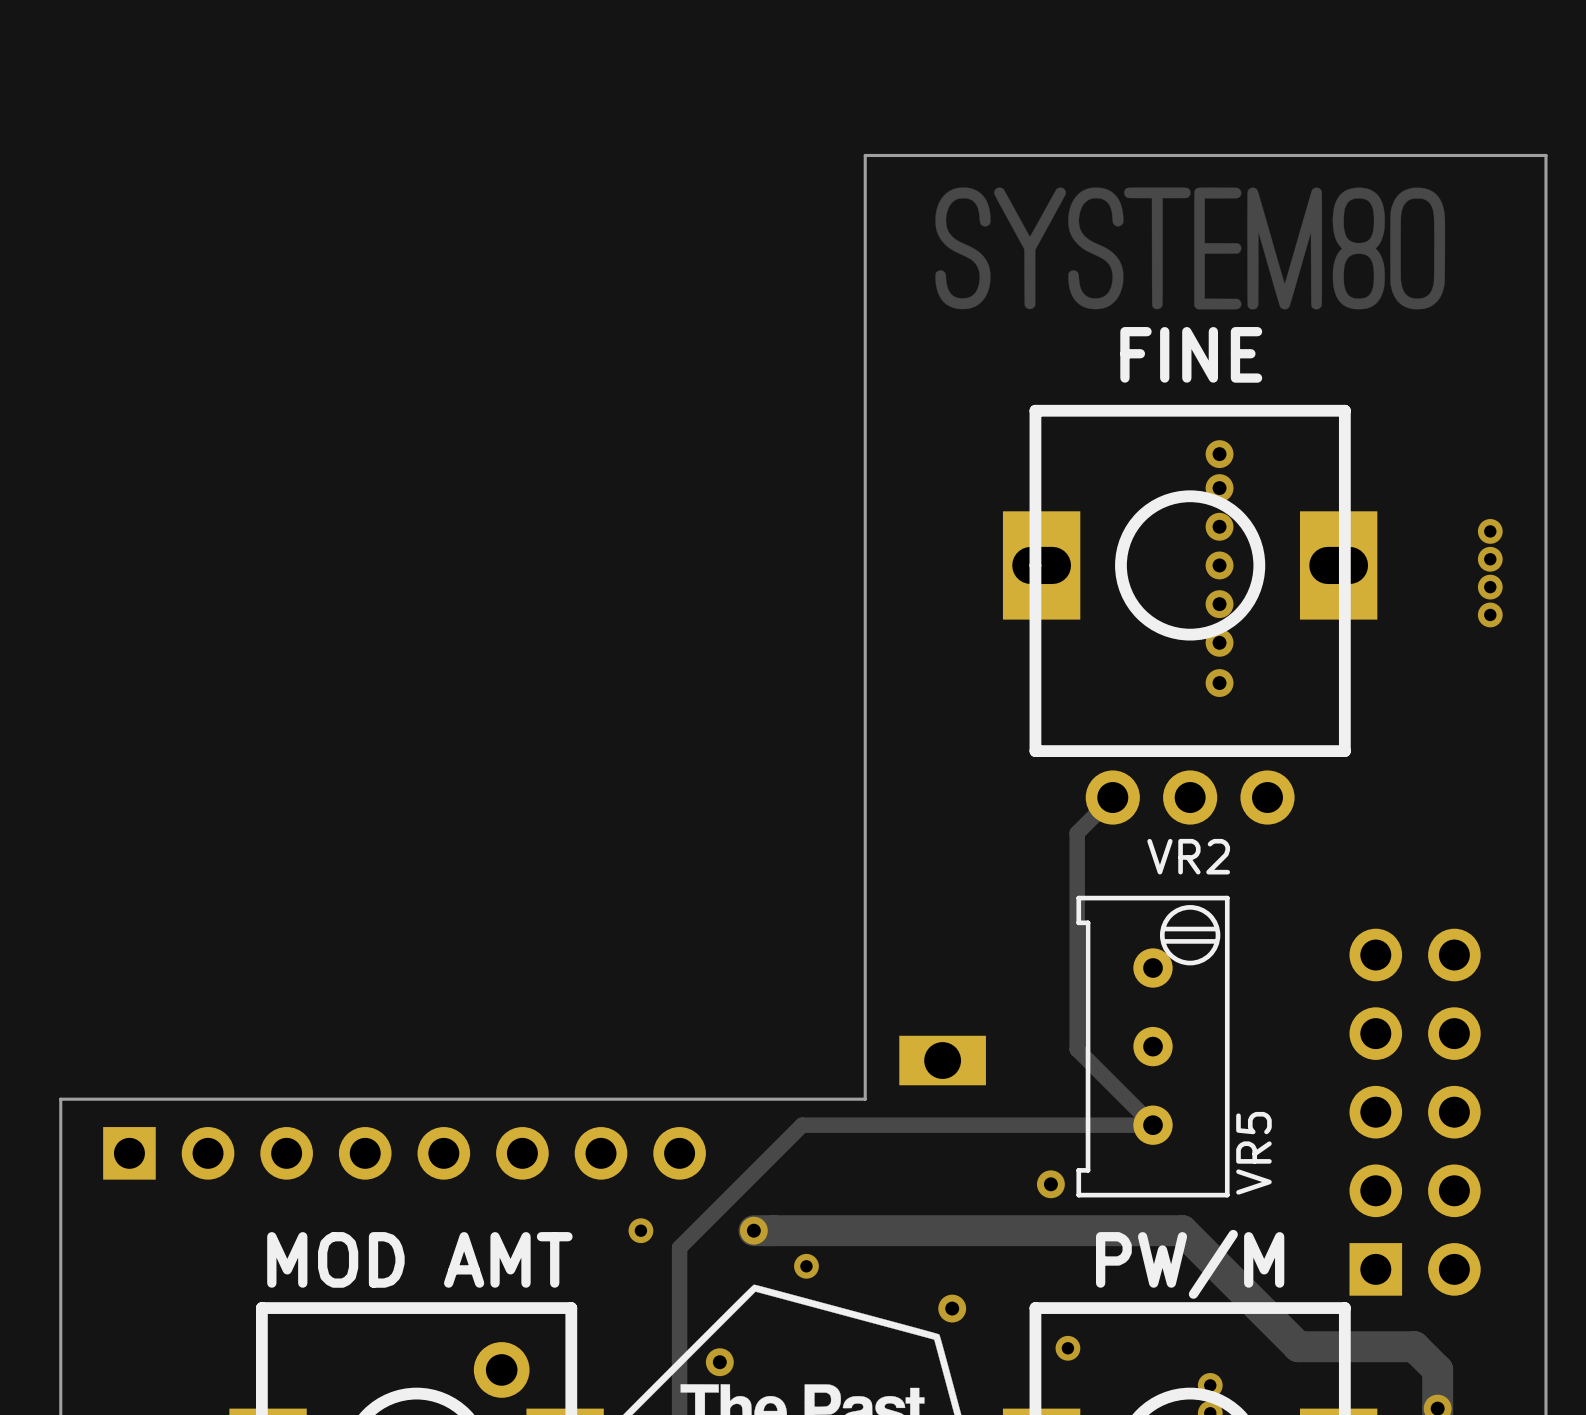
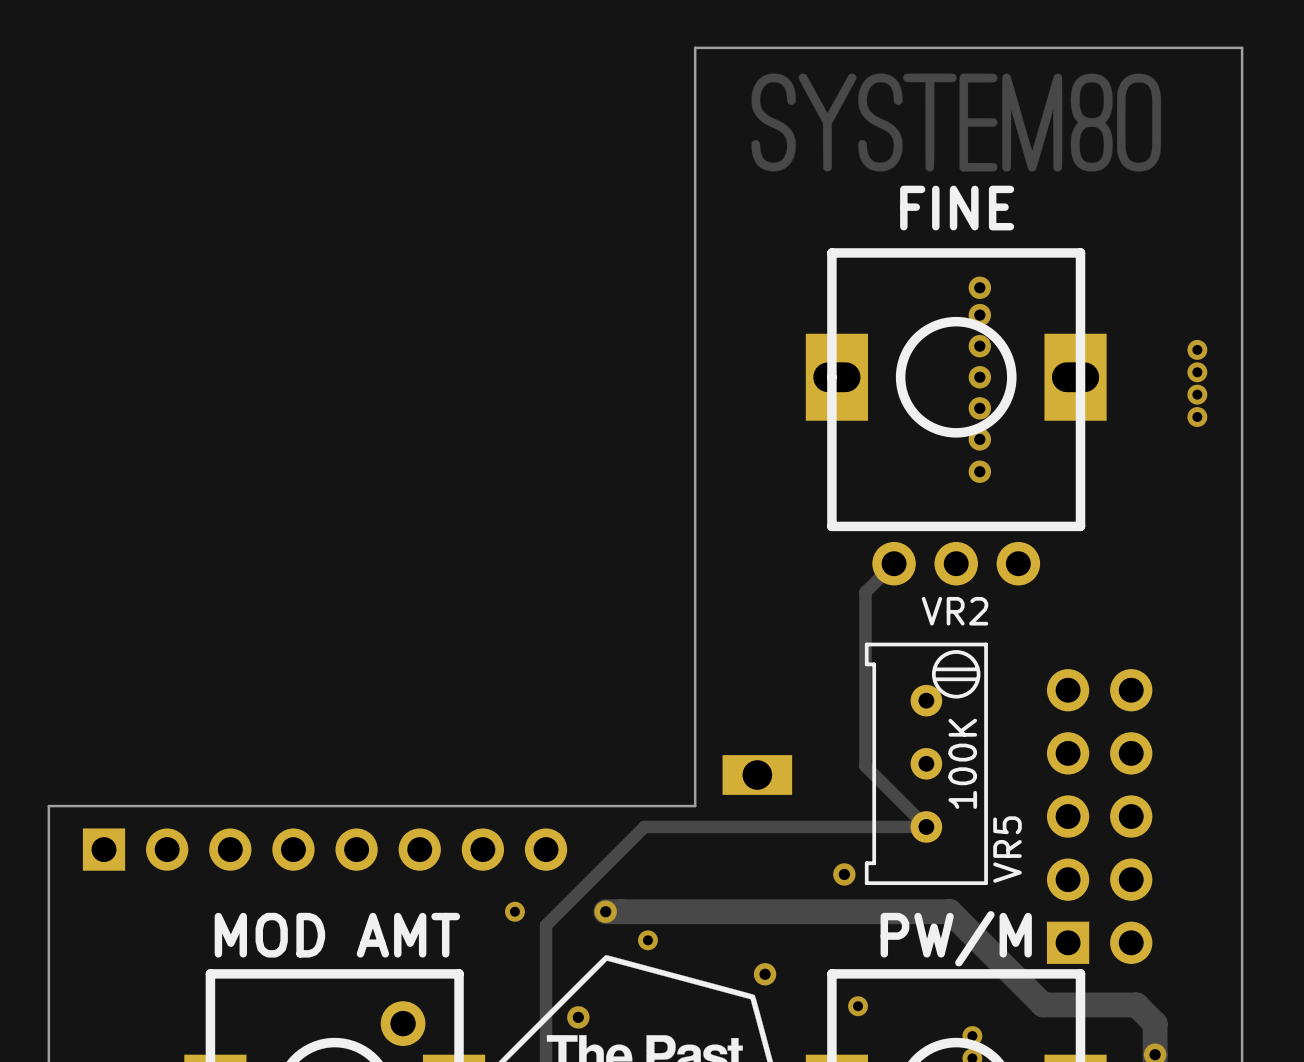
VR5 value: none -> 100K (962, 763)
part position: (1415, 1112) -> (1099, 816)

